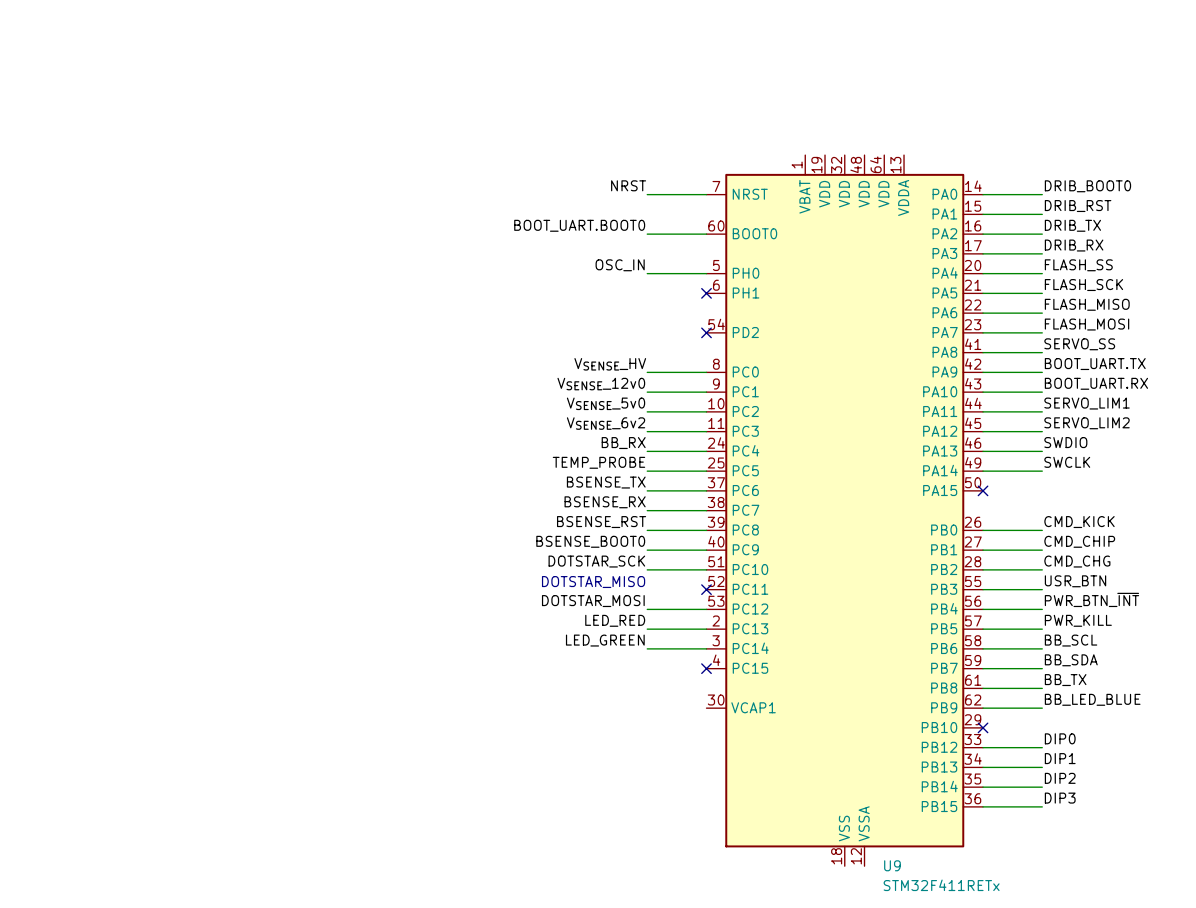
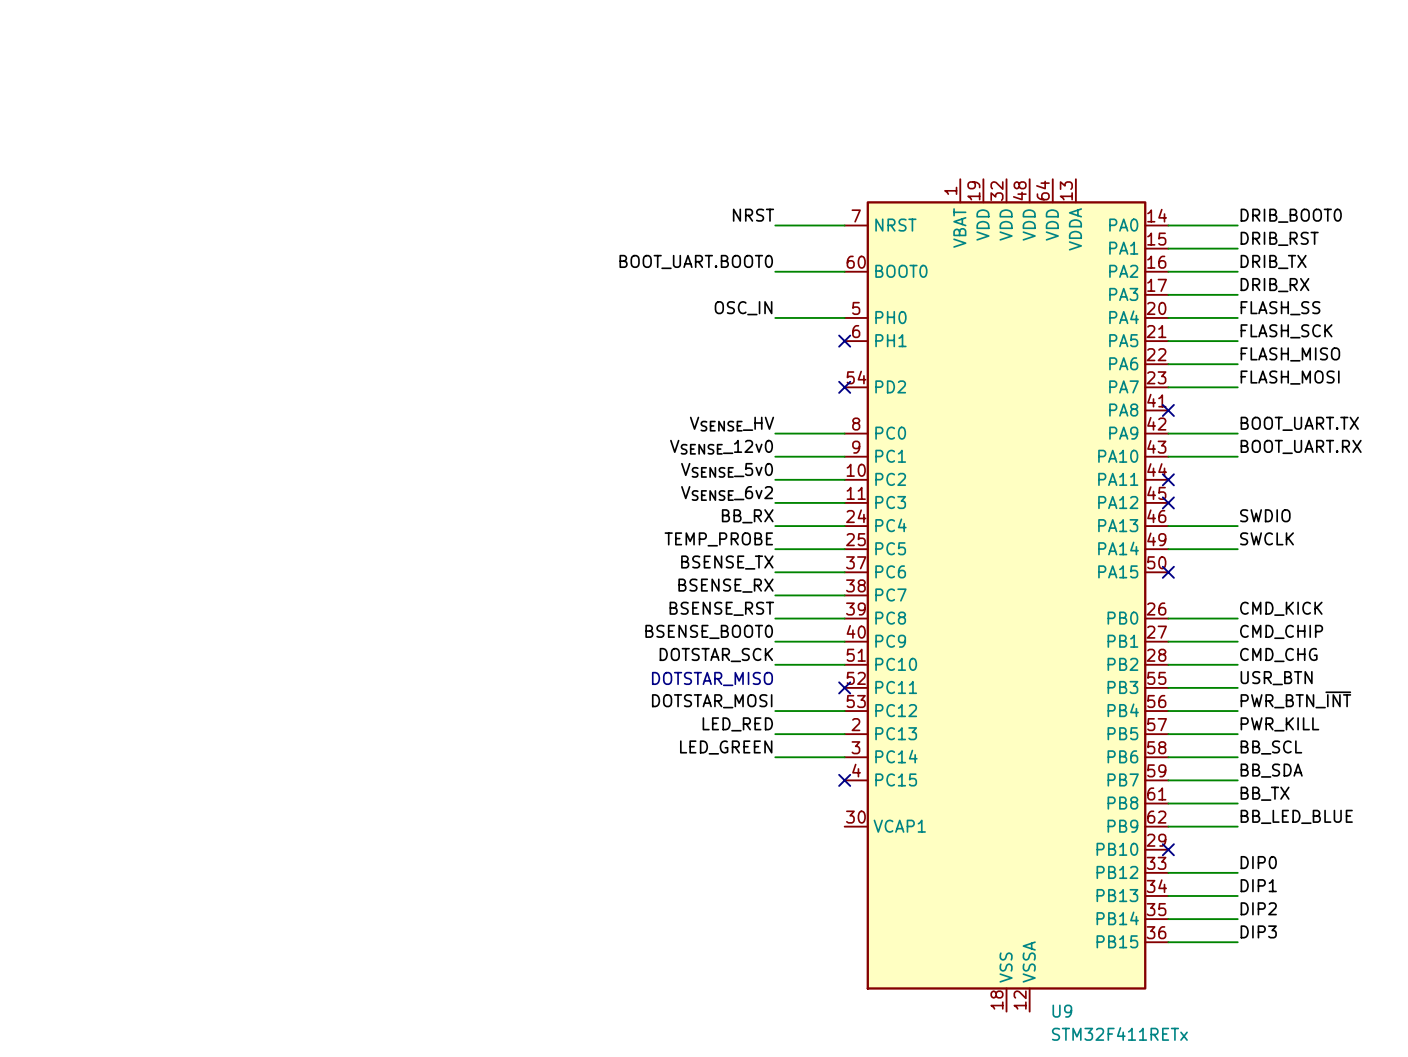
label: SERVO_SS (1079, 344) -> none
wire: (983, 352) (1042, 352) -> none
no-connect mark: none -> (1168, 410)
label: SERVO_LIM1 (1087, 403) -> none
wire: (983, 411) (1042, 411) -> none
no-connect mark: none -> (1168, 479)
label: SERVO_LIM2 (1087, 423) -> none
wire: (983, 431) (1042, 431) -> none
no-connect mark: none -> (1168, 502)

